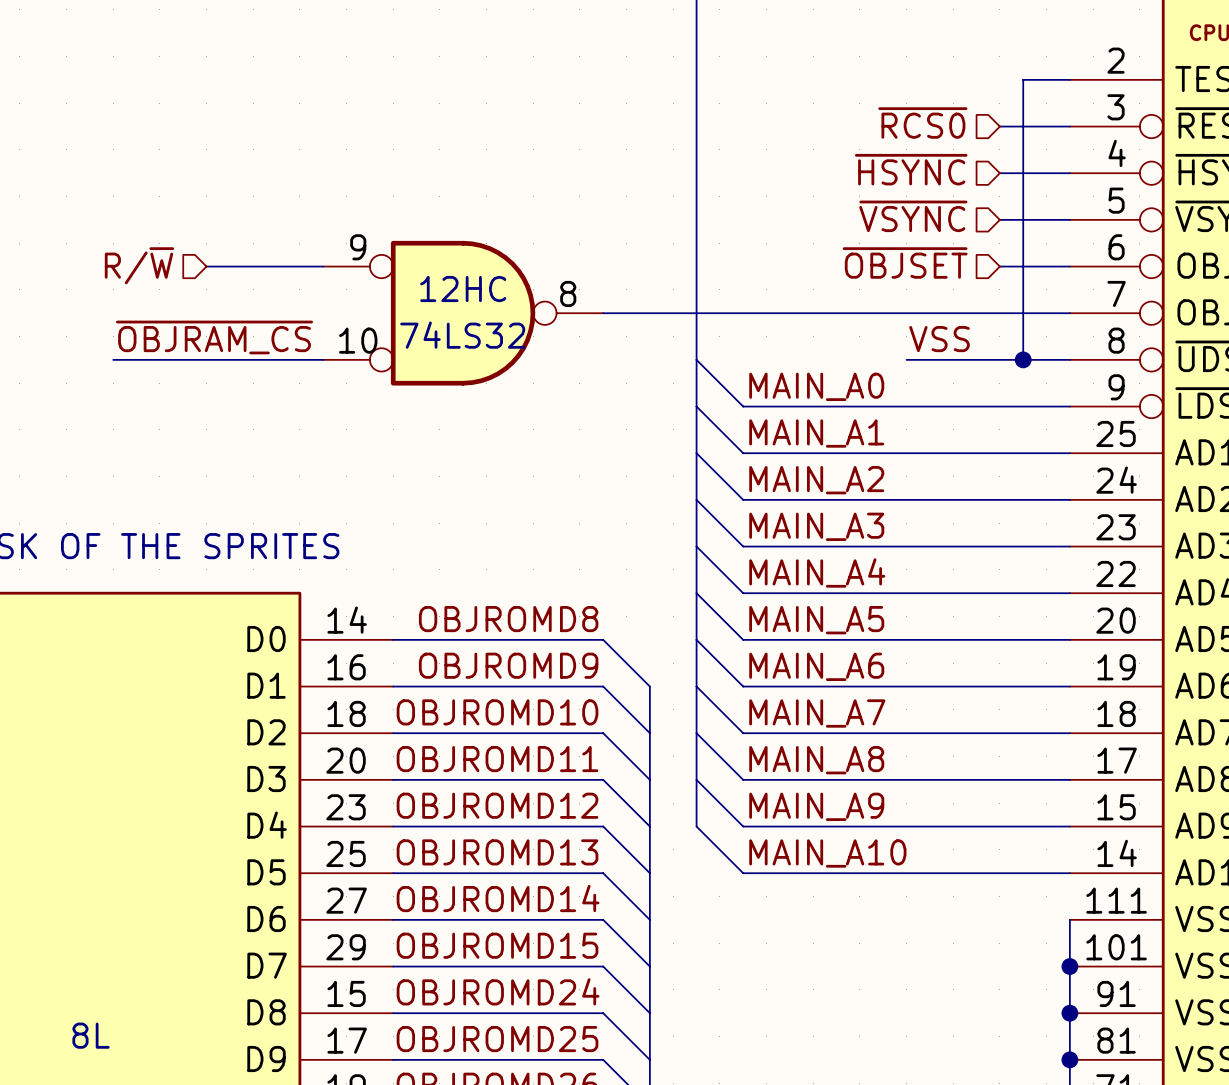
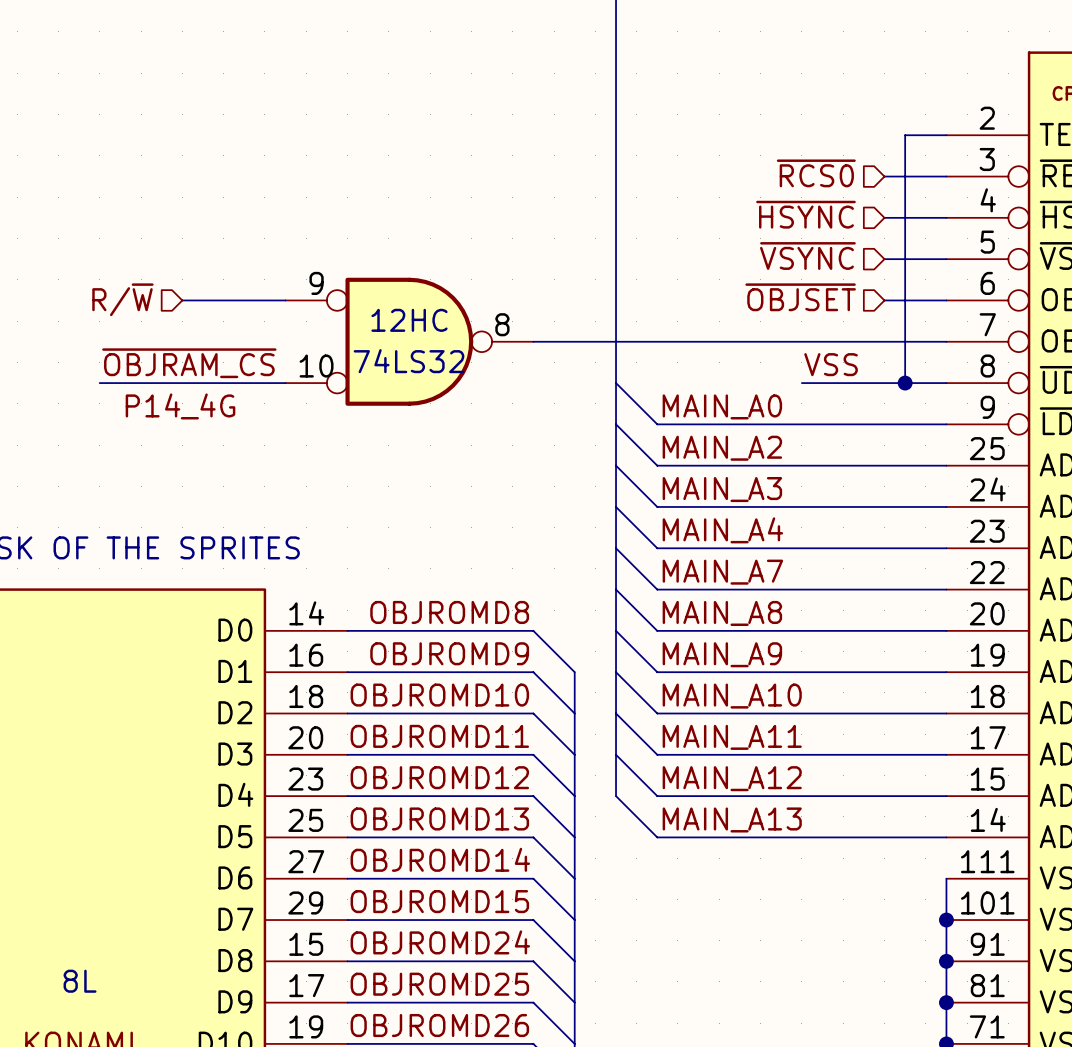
label: none -> P14_4G (180, 406)
label: MAIN_A1 (816, 433) -> MAIN_A2 (722, 448)
label: MAIN_A2 (816, 480) -> MAIN_A3 (722, 489)
label: MAIN_A3 (816, 526) -> MAIN_A4 (722, 530)
label: MAIN_A4 (817, 572) -> MAIN_A7 (722, 572)
label: MAIN_A5 (816, 620) -> MAIN_A8 (722, 613)
label: MAIN_A6 (816, 666) -> MAIN_A9 (722, 654)
label: MAIN_A7 (817, 713) -> MAIN_A10 (732, 696)
label: MAIN_A8 (816, 760) -> MAIN_A11 (732, 737)
label: MAIN_A9 (816, 806) -> MAIN_A12 (732, 778)
label: MAIN_A10 (827, 853) -> MAIN_A13 (732, 819)

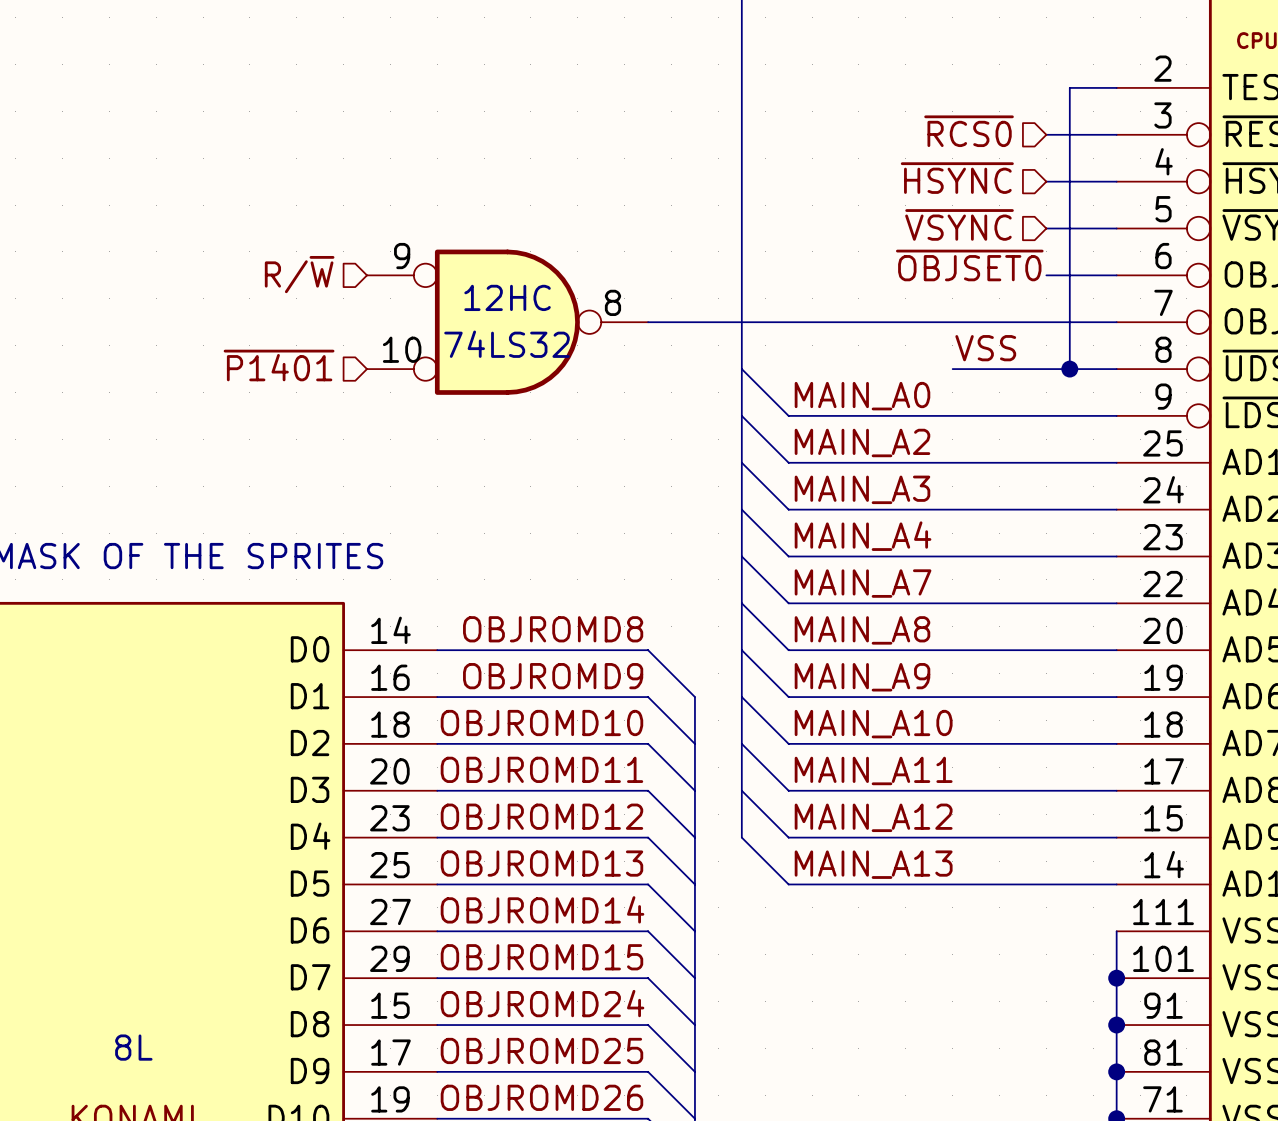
label: none -> ~{OBJSET0} (969, 265)
hierarchical label: ~{OBJSET} (800, 297) -> none
hierarchical label position: R/~{W} (122, 299) -> R/~{W} (299, 274)
wire: (182, 300) (285, 300) -> none
label: ~{OBJRAM_CS} (189, 363) -> none
hierarchical label: none -> ~{P1401} (279, 365)
wire: (99, 383) (285, 383) -> none
label: P14_4G (180, 406) -> none

